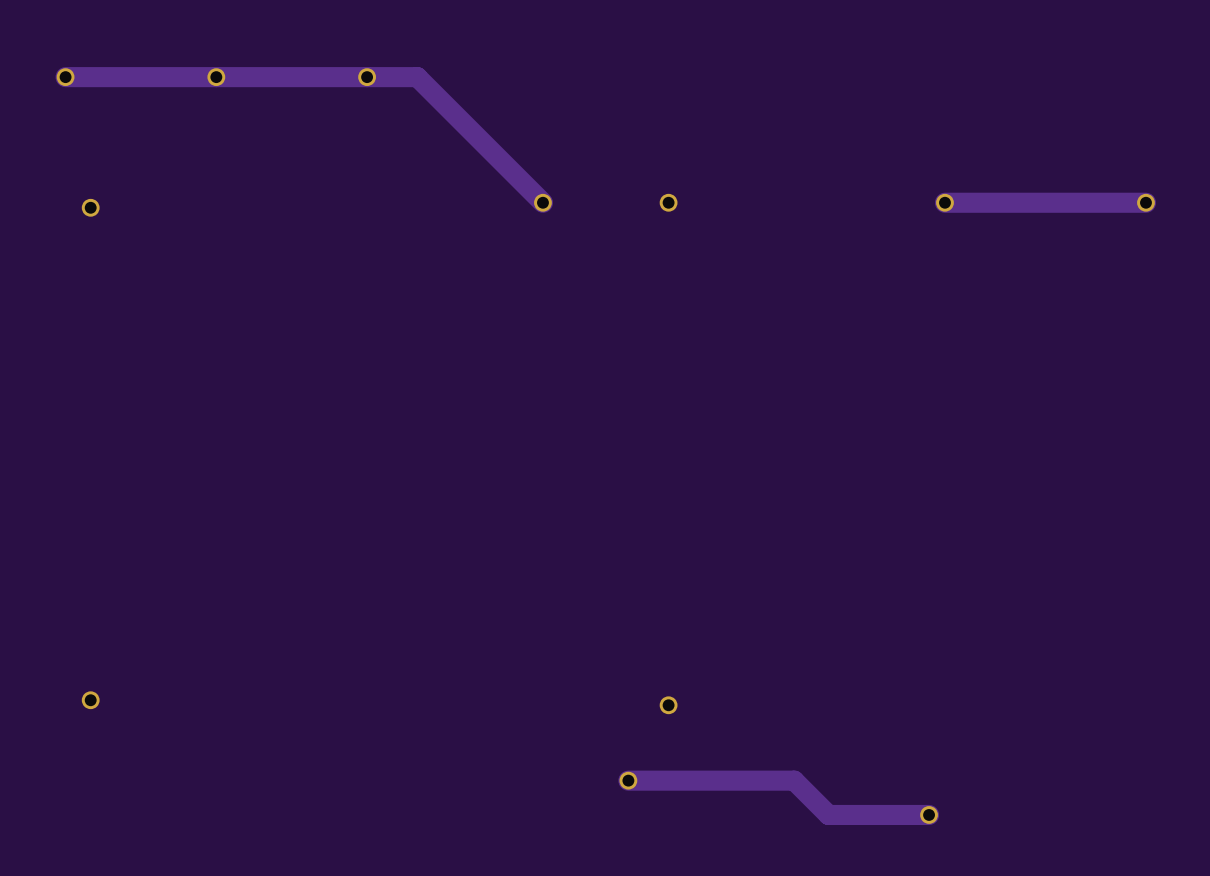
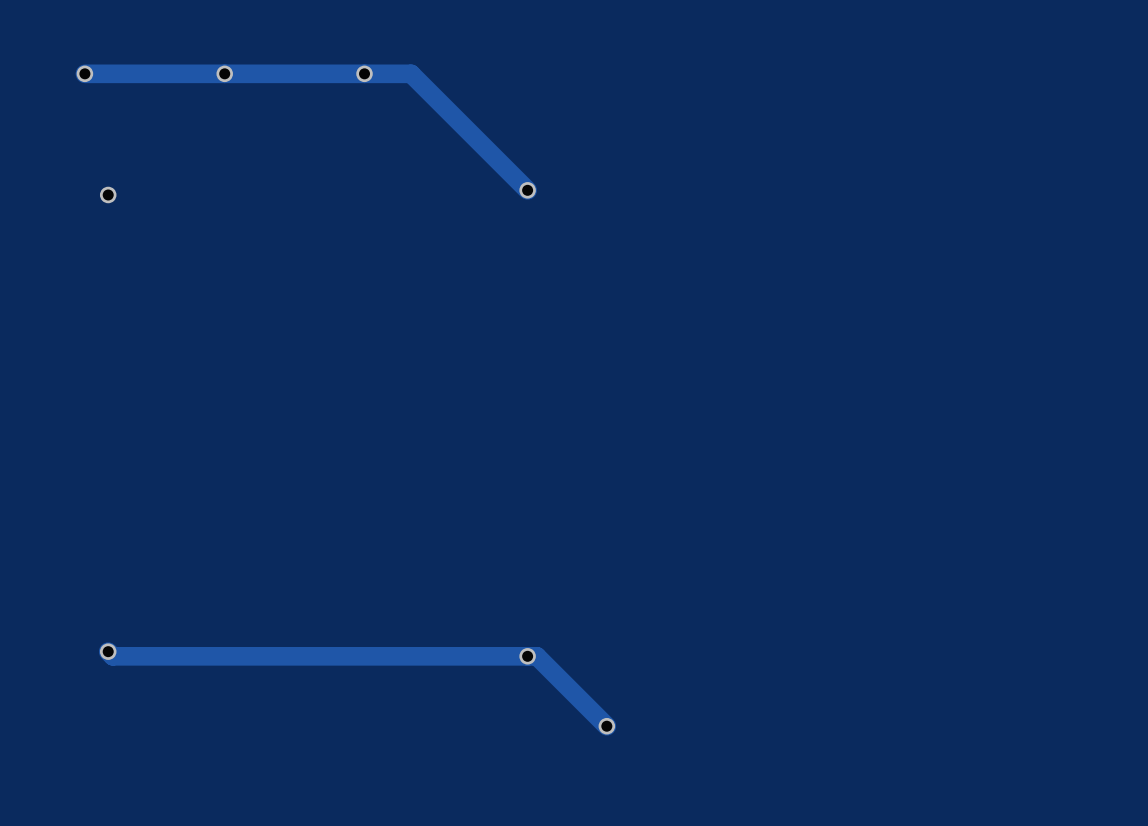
via: (668, 202) -> none
via: (944, 202) -> none
track: (1145, 202) (944, 202) -> none
via: (1145, 202) -> none
via position: (668, 705) -> (527, 656)
track: (628, 780) (794, 780) (828, 814) (929, 814) -> (606, 726) (536, 656) (112, 656) (108, 651)
via: (929, 814) -> none

